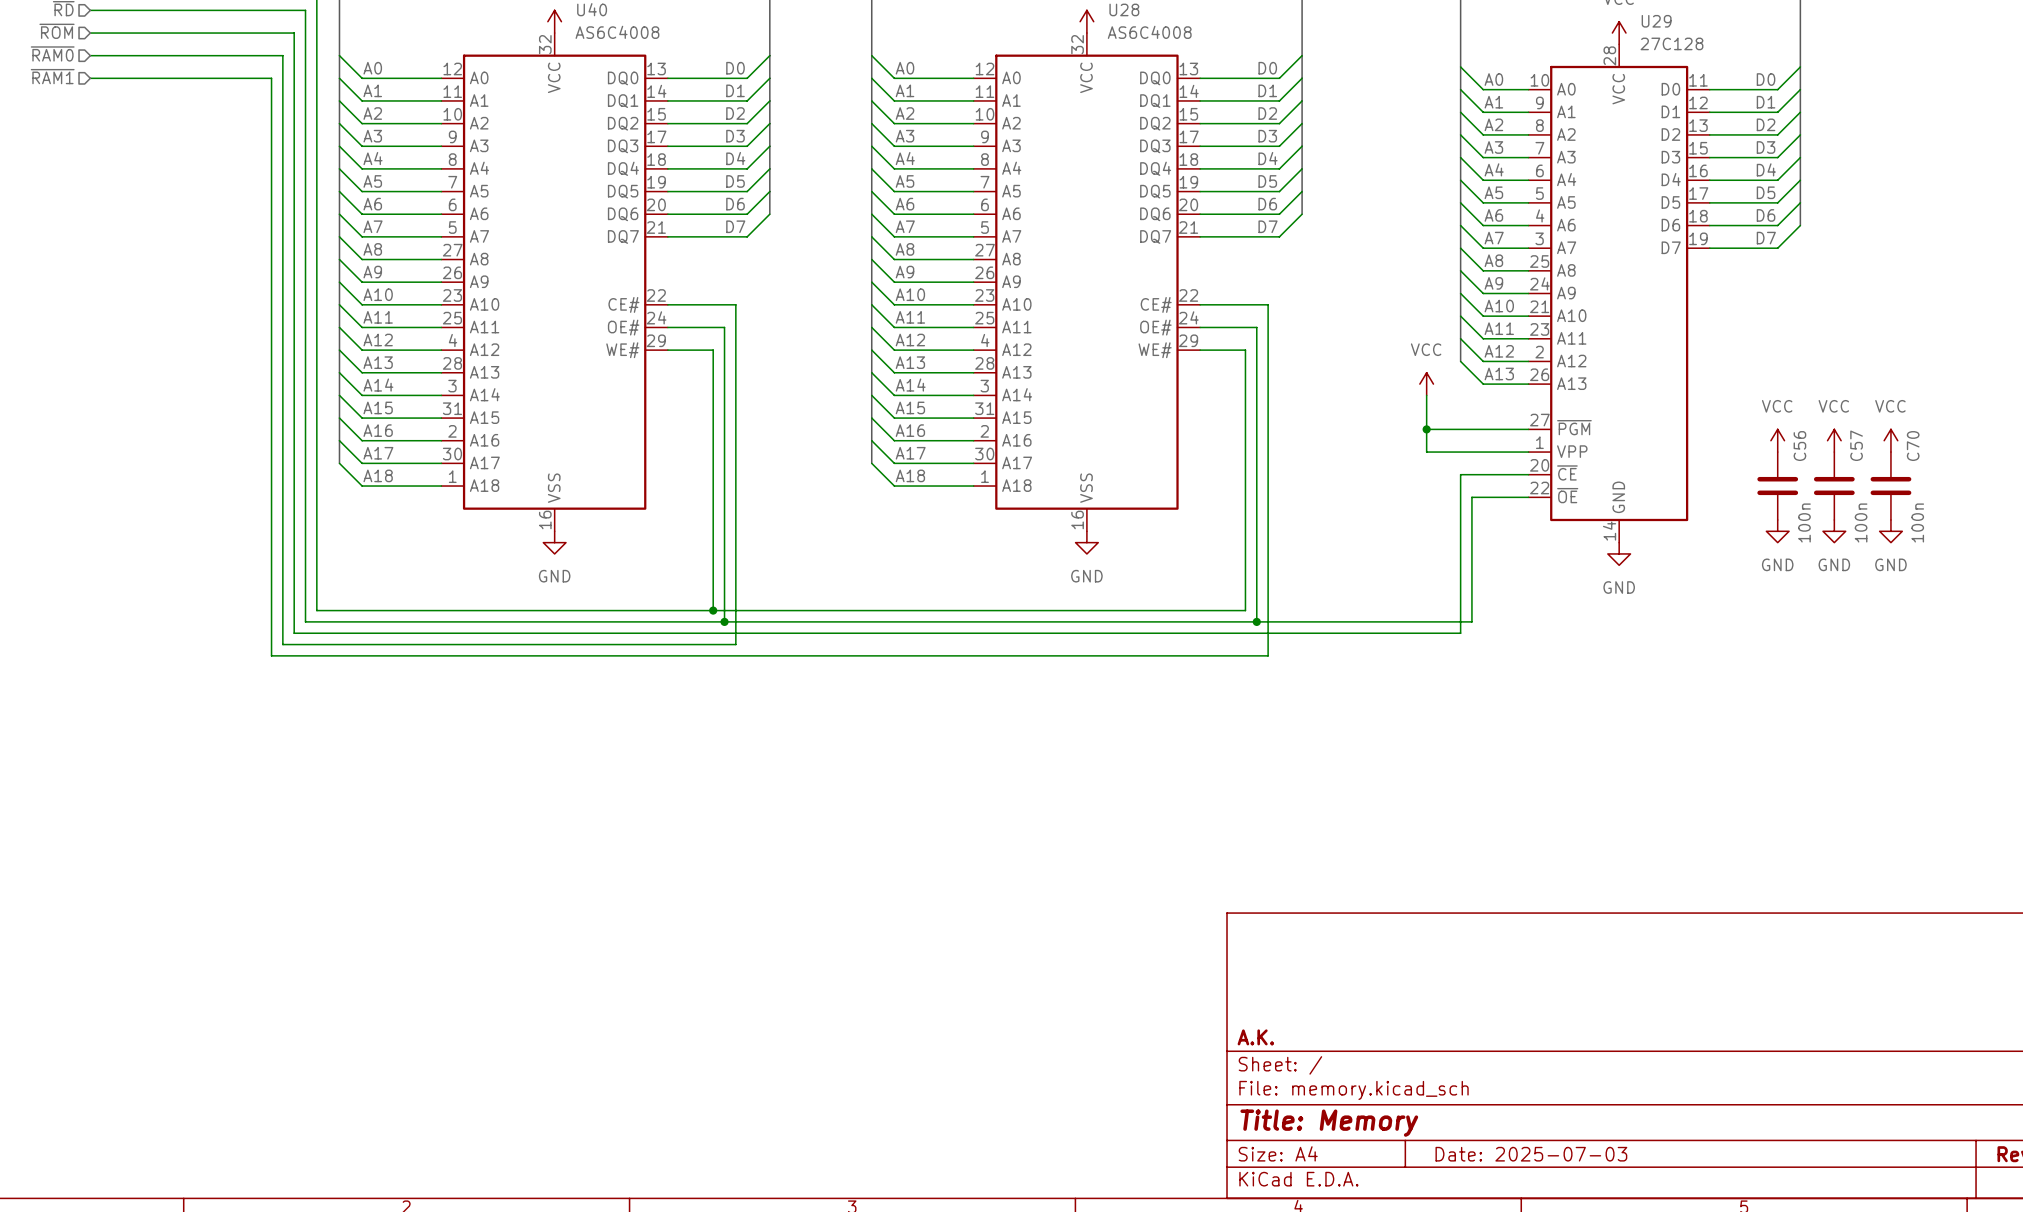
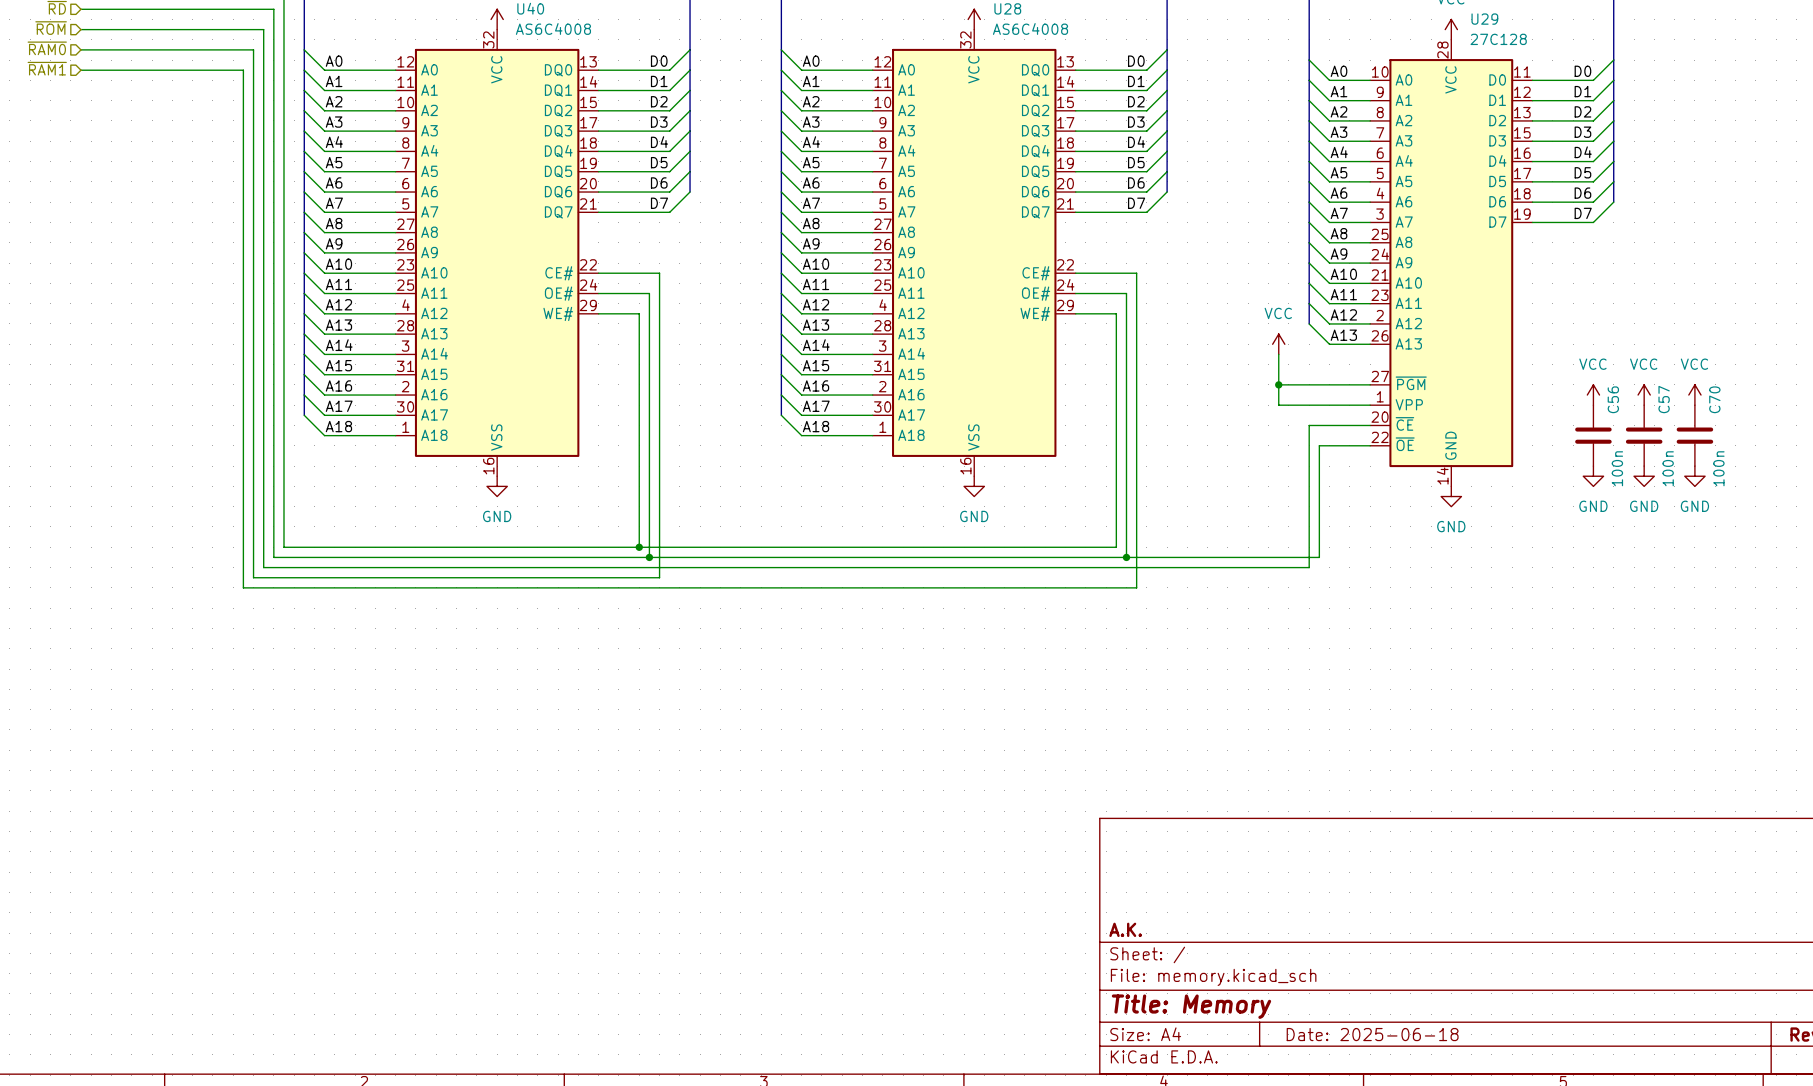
title block: Date: 2025-07-03 (1531, 1154) -> Date: 2025-06-18 (1372, 1034)

